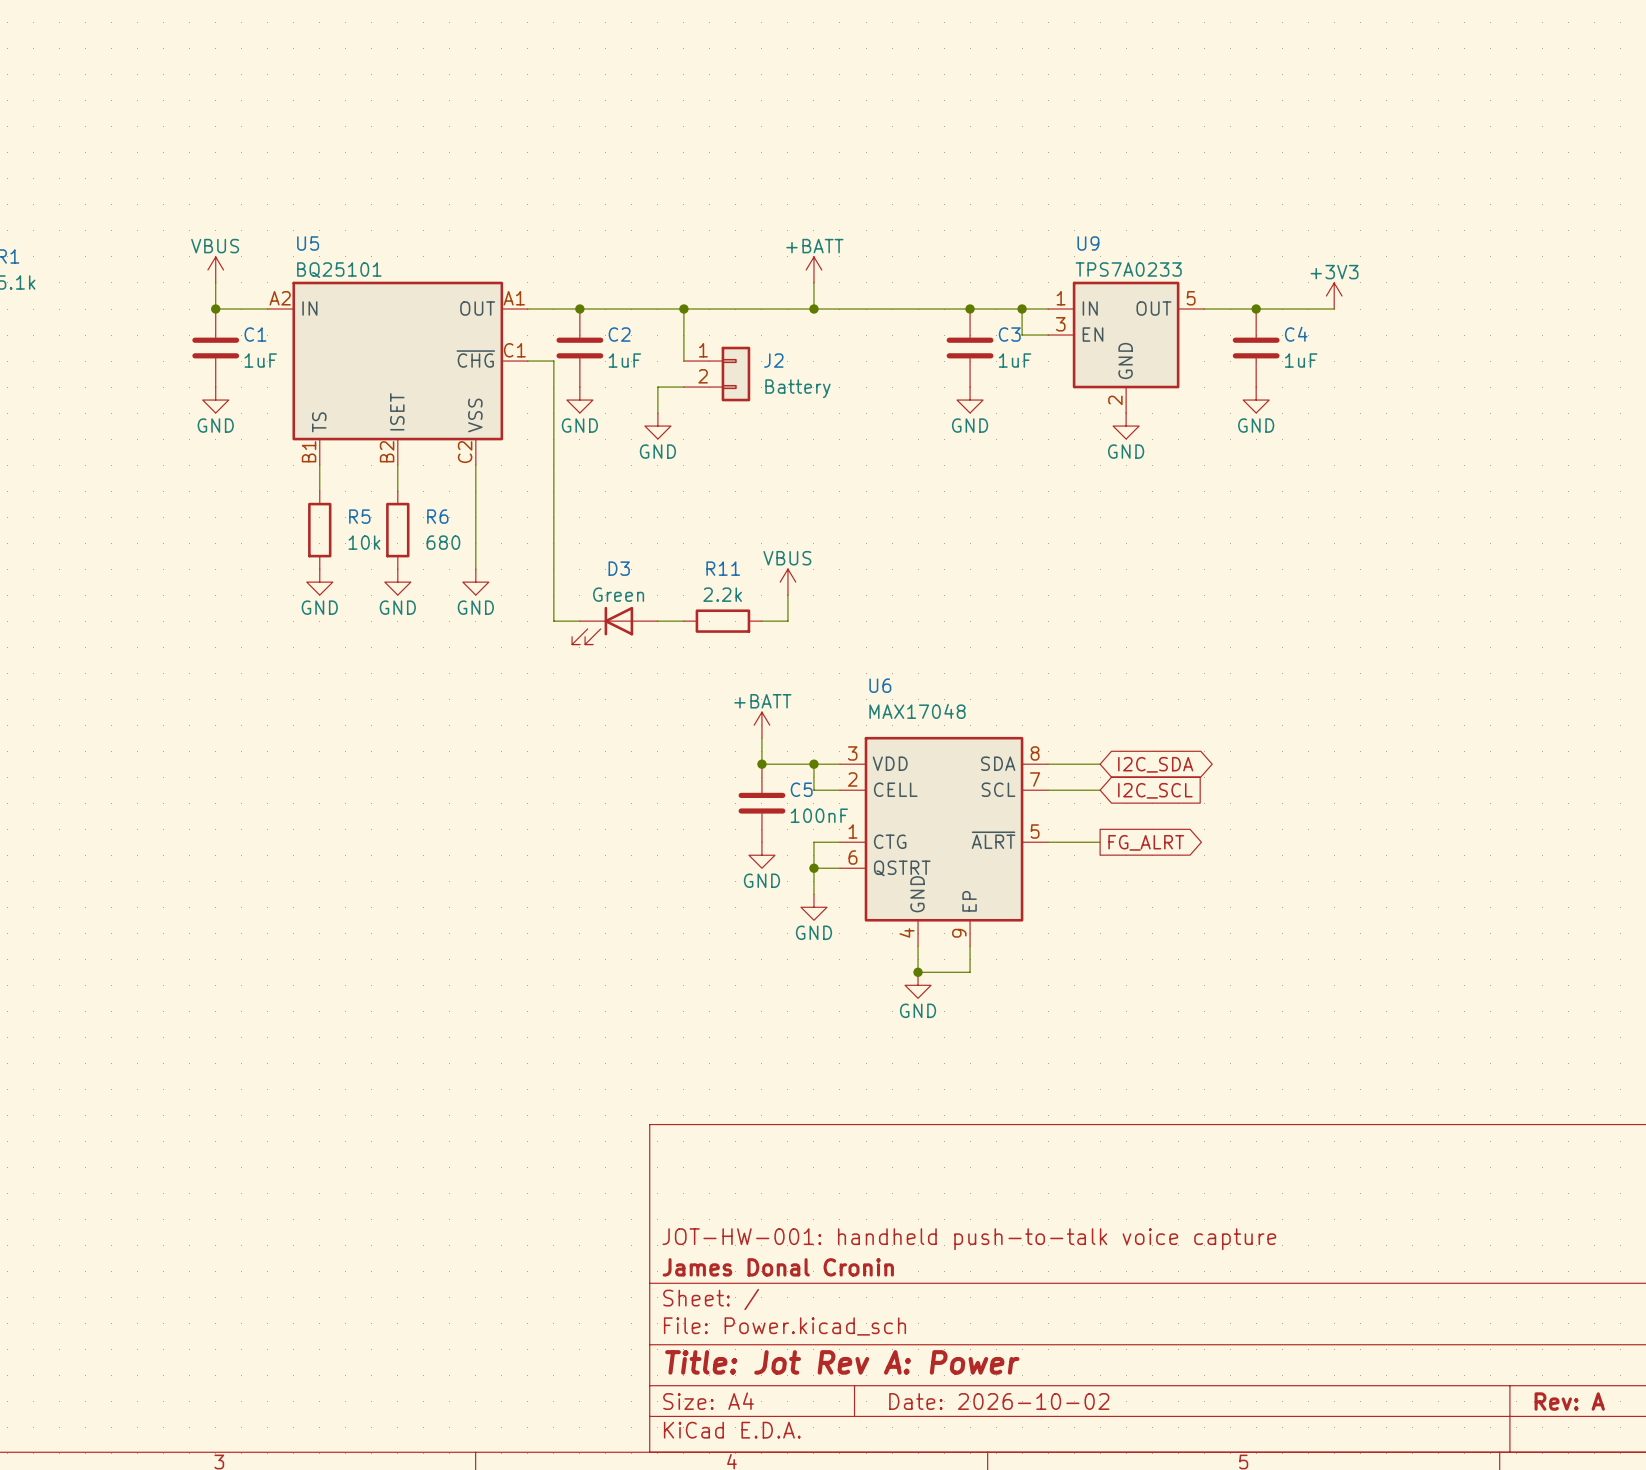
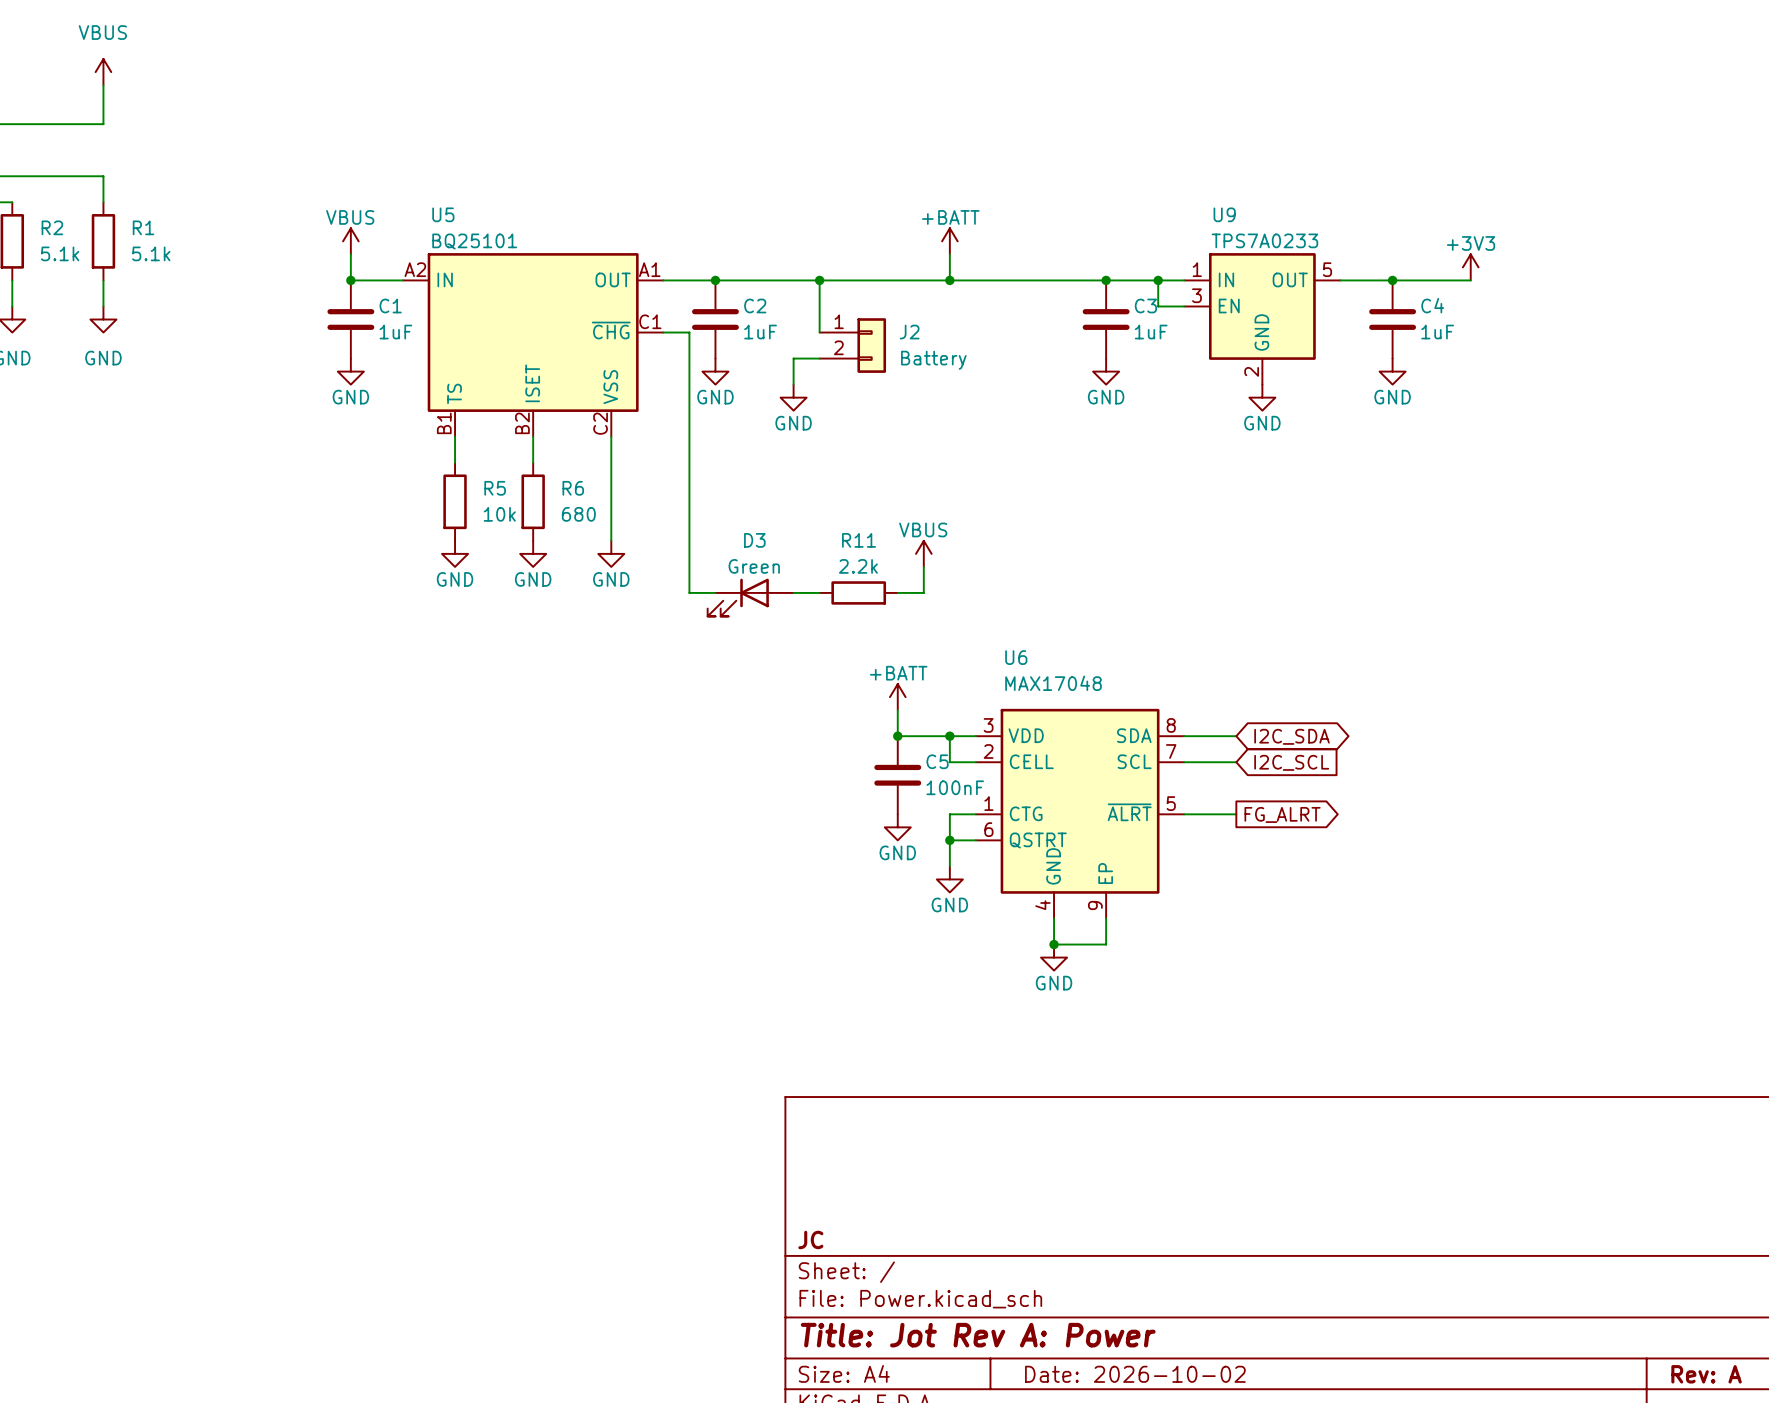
title block: JOT-HW-001: handheld push-to-talk voice capture (969, 1239) -> none
title block: James Donal Cronin (778, 1267) -> JC (810, 1239)

